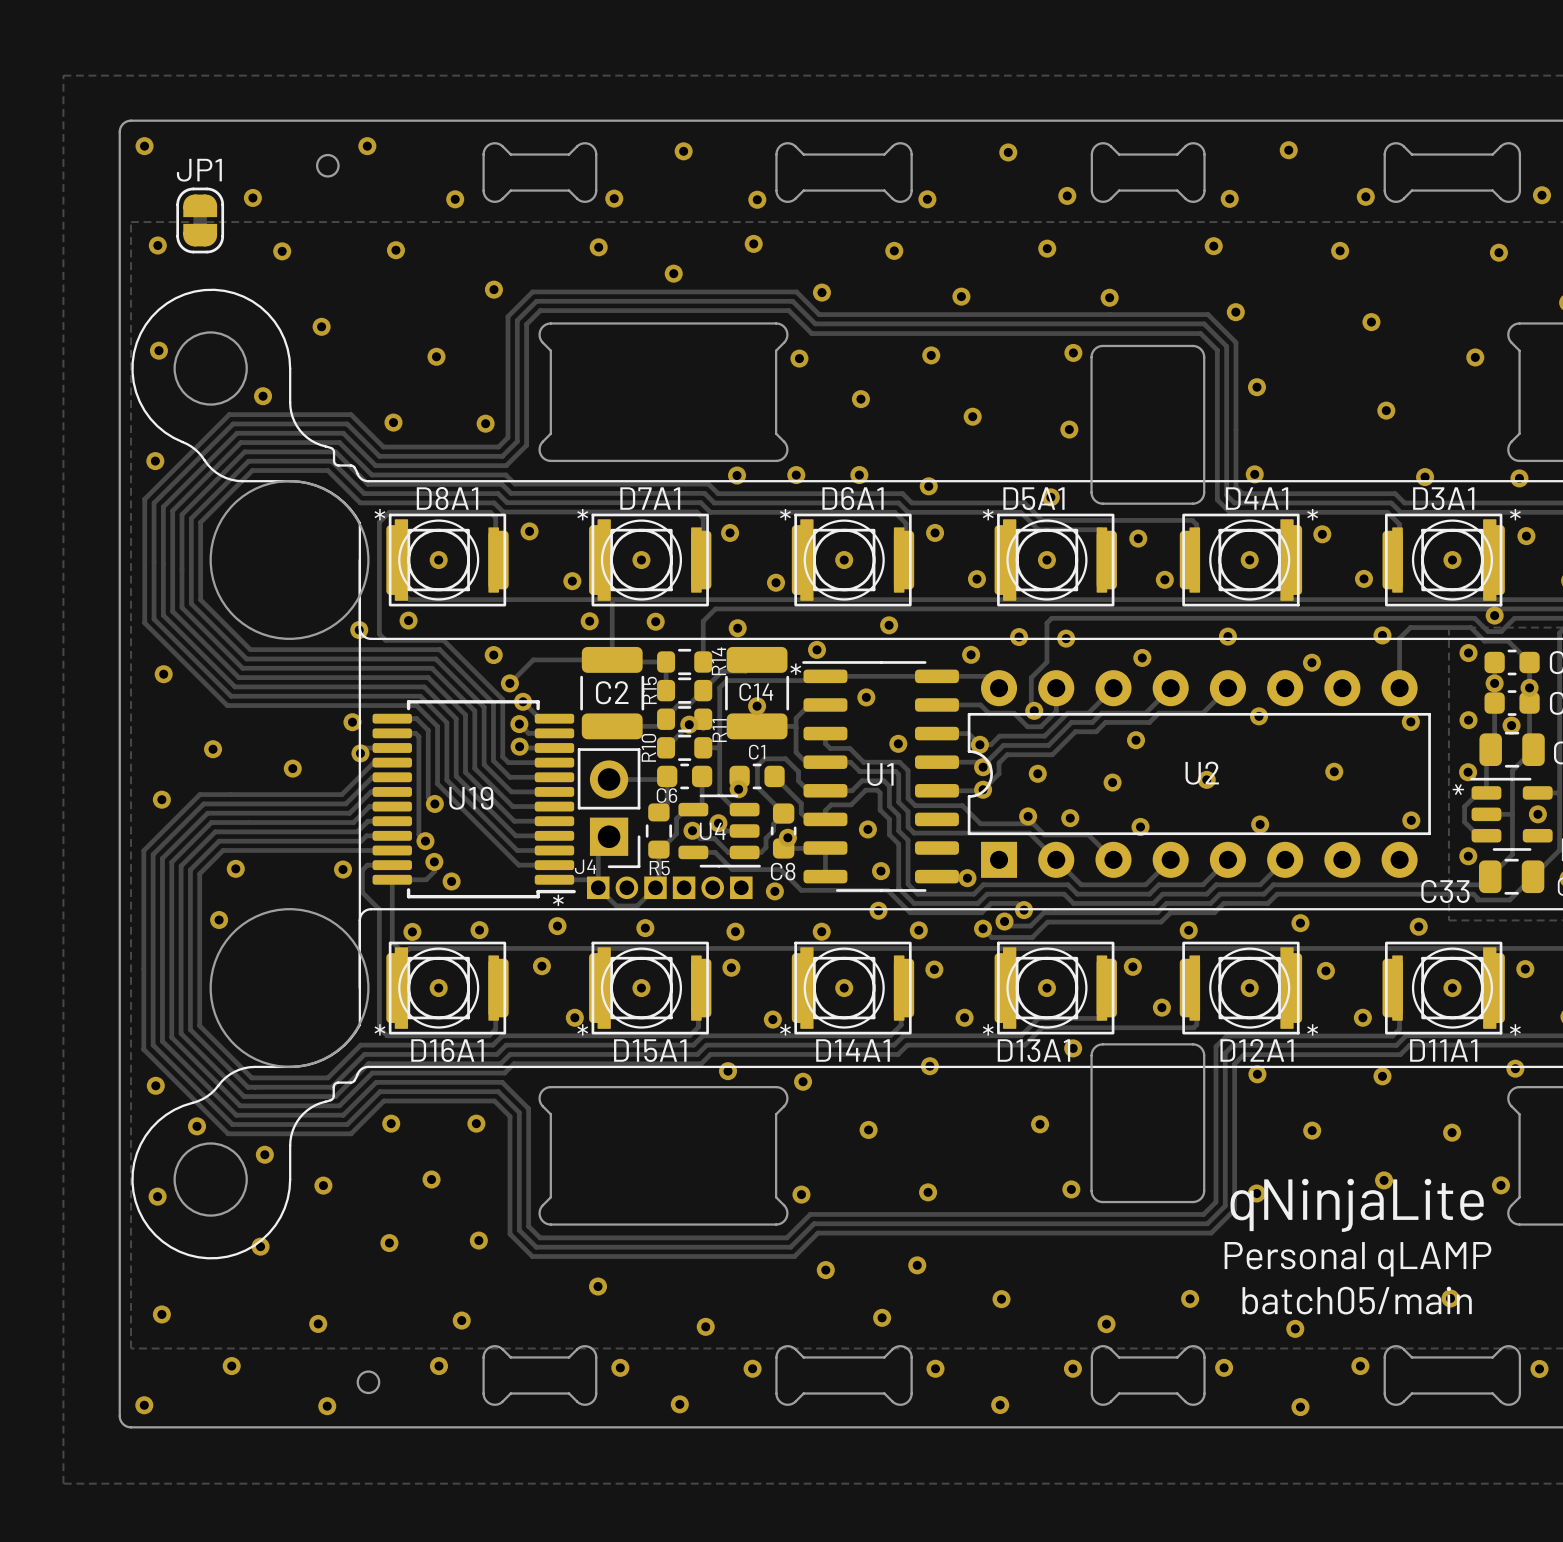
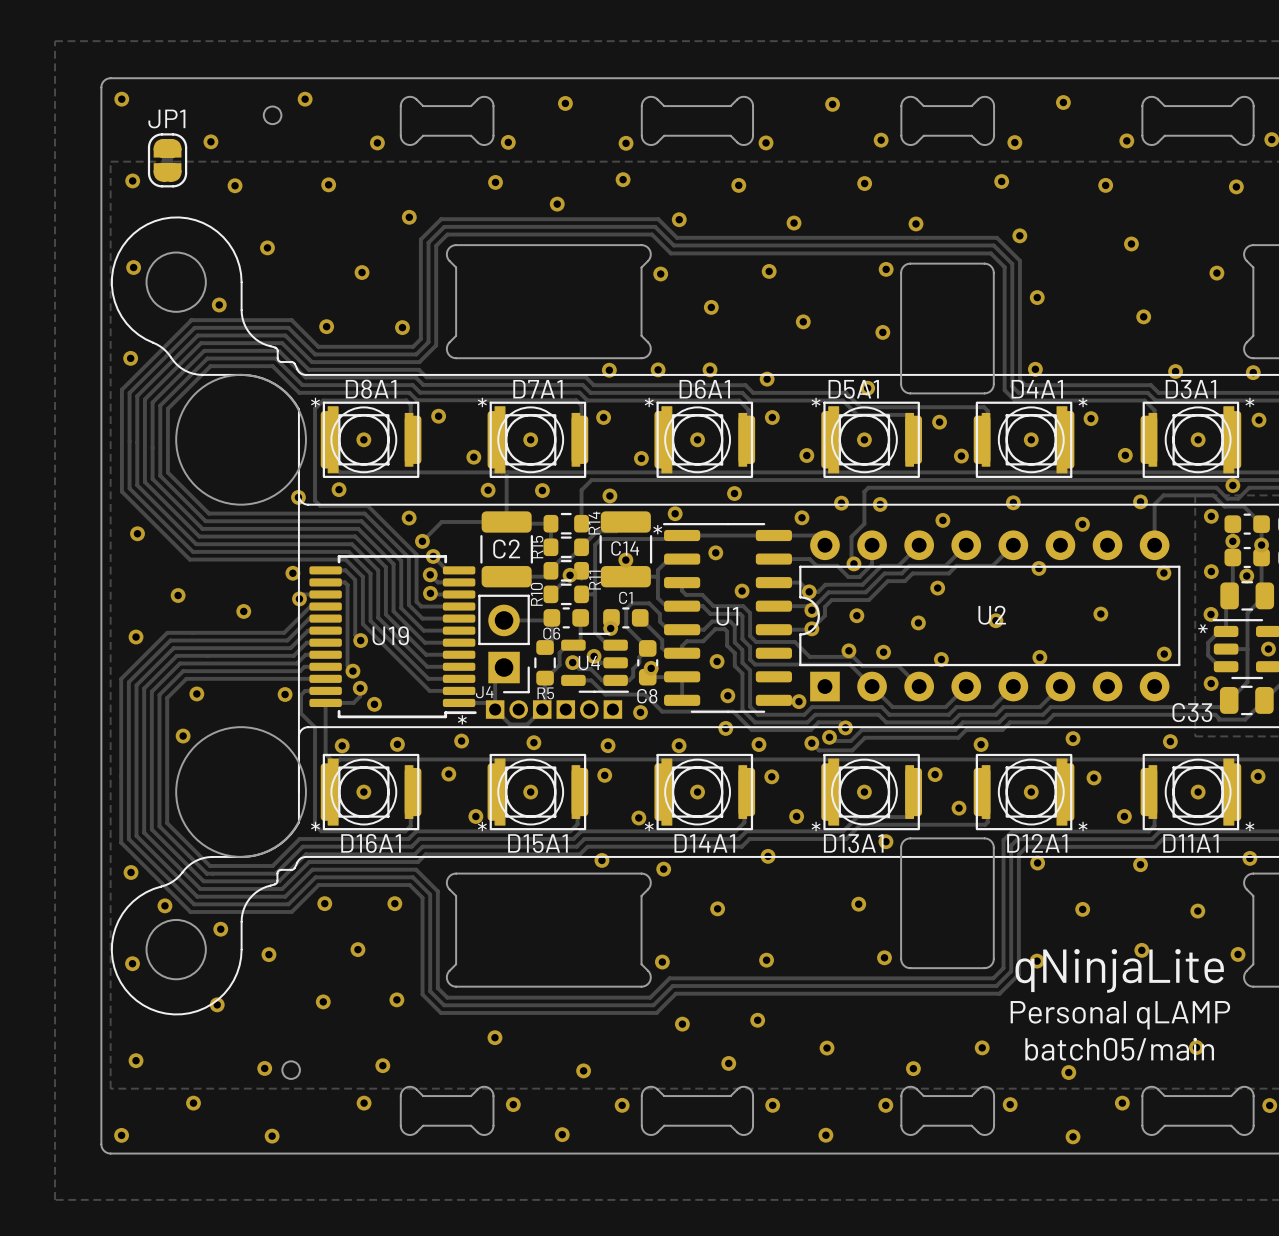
round board edge position: (368, 1382) -> (291, 1070)

